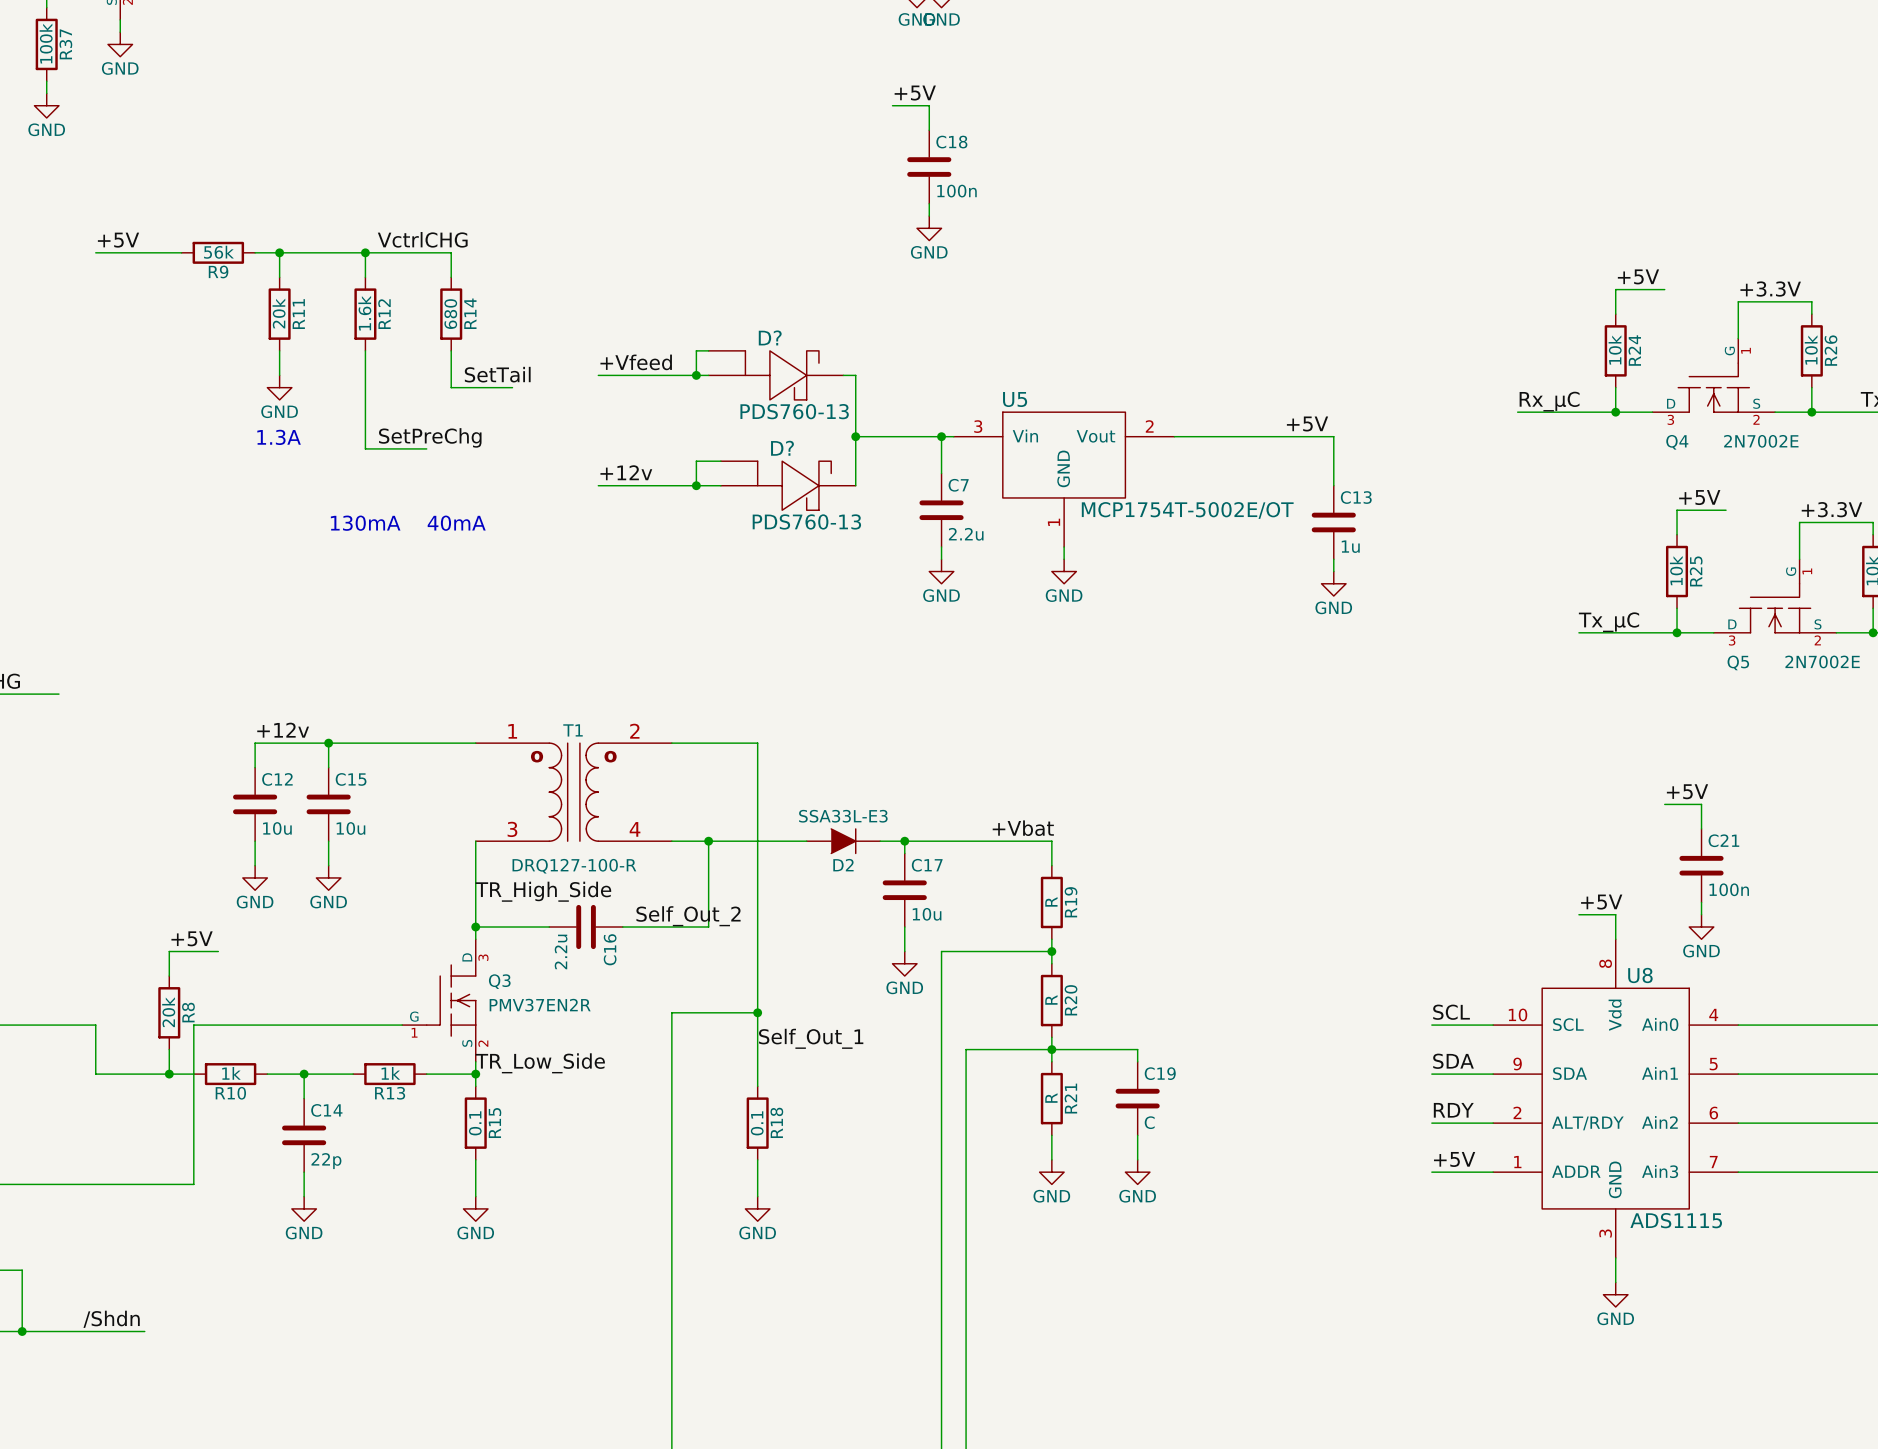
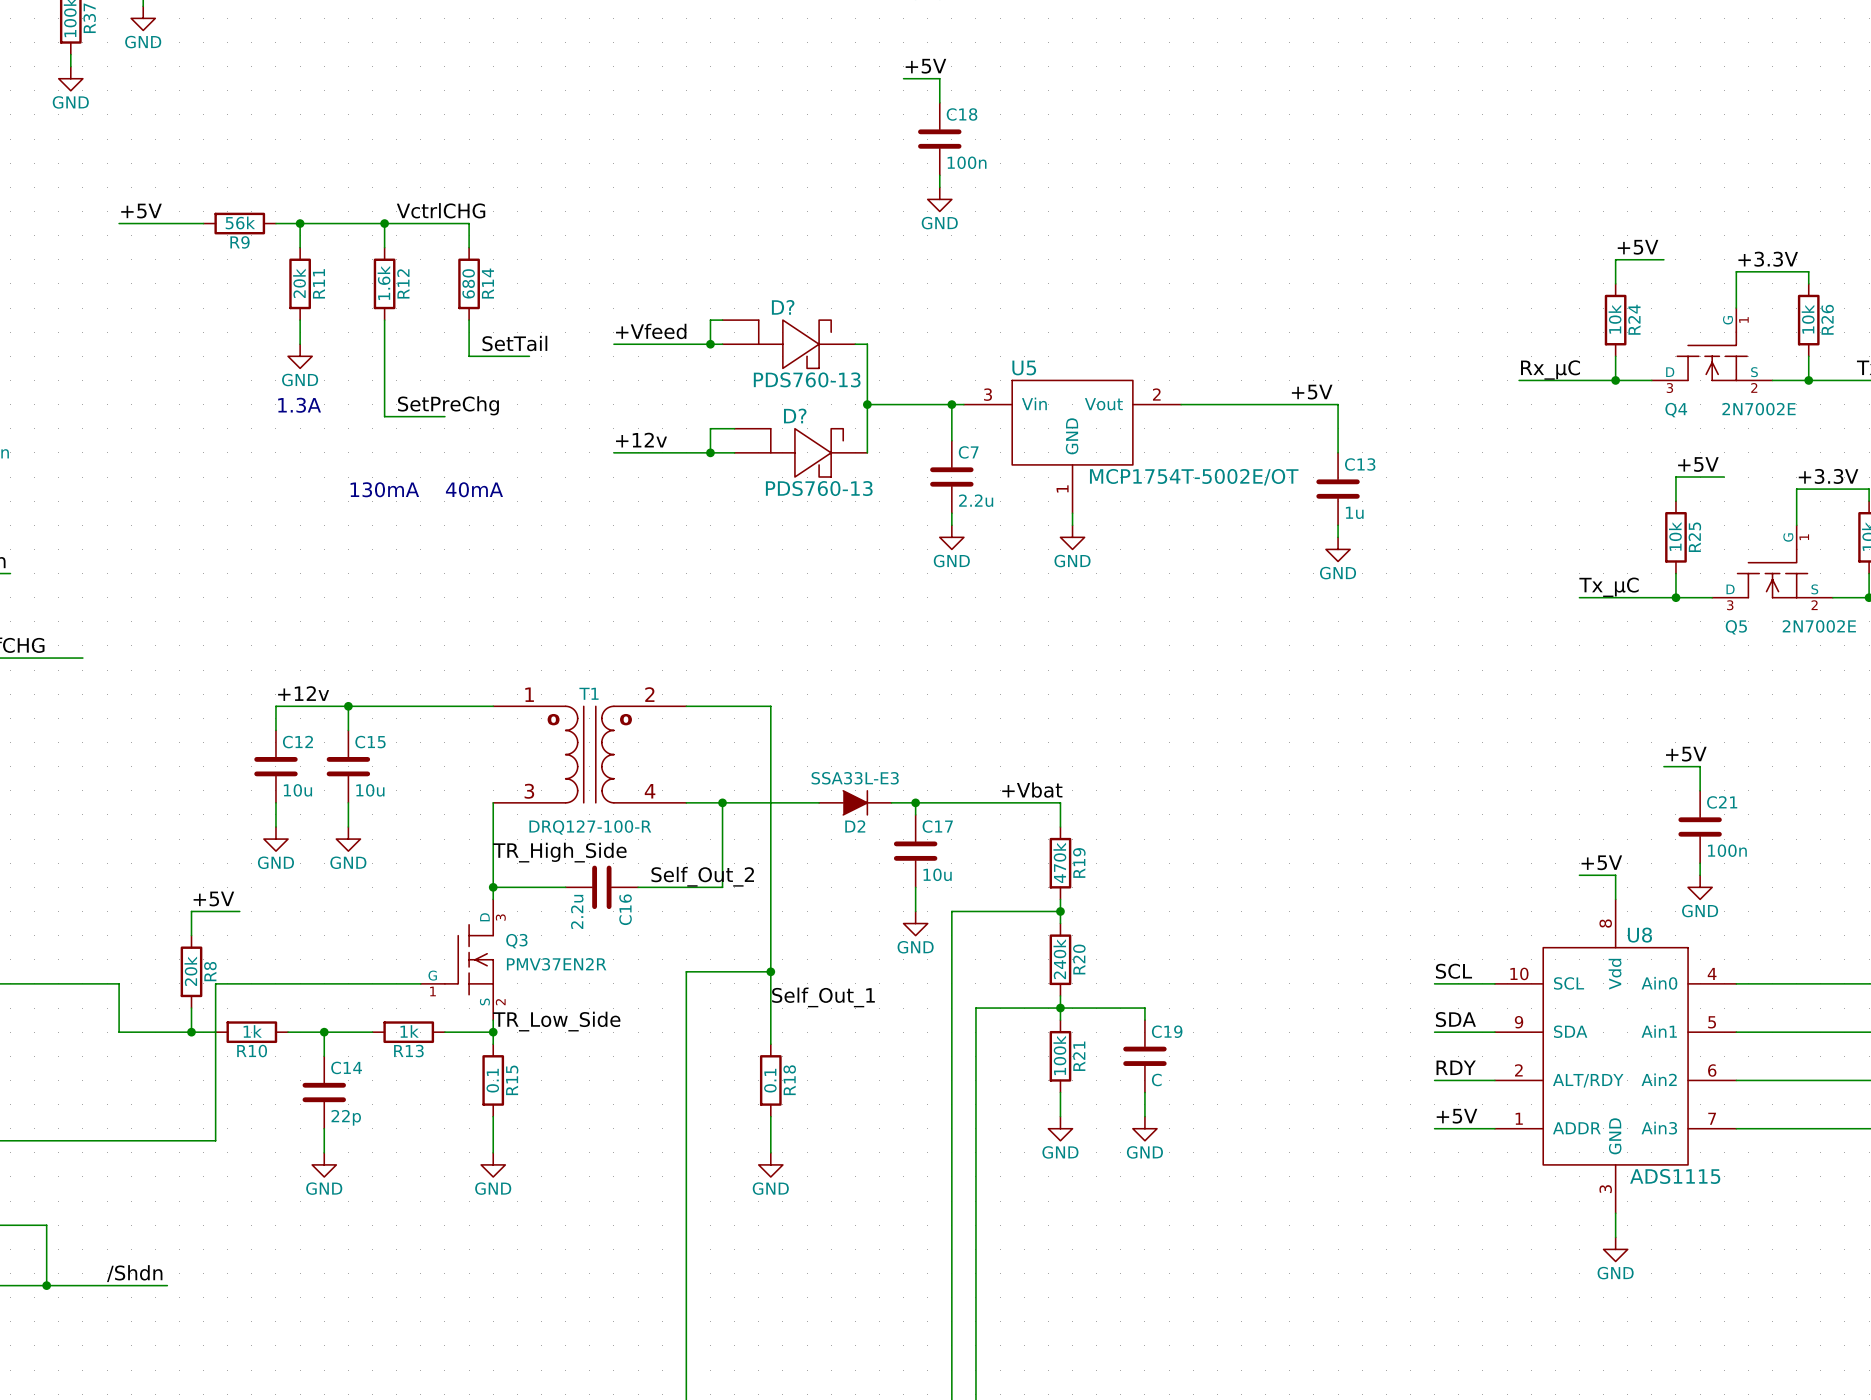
R19 value: R (1051, 901) -> 470k (1059, 862)
R20 value: R (1051, 999) -> 240k (1059, 959)
R21 value: R (1051, 1098) -> 100k (1059, 1055)

